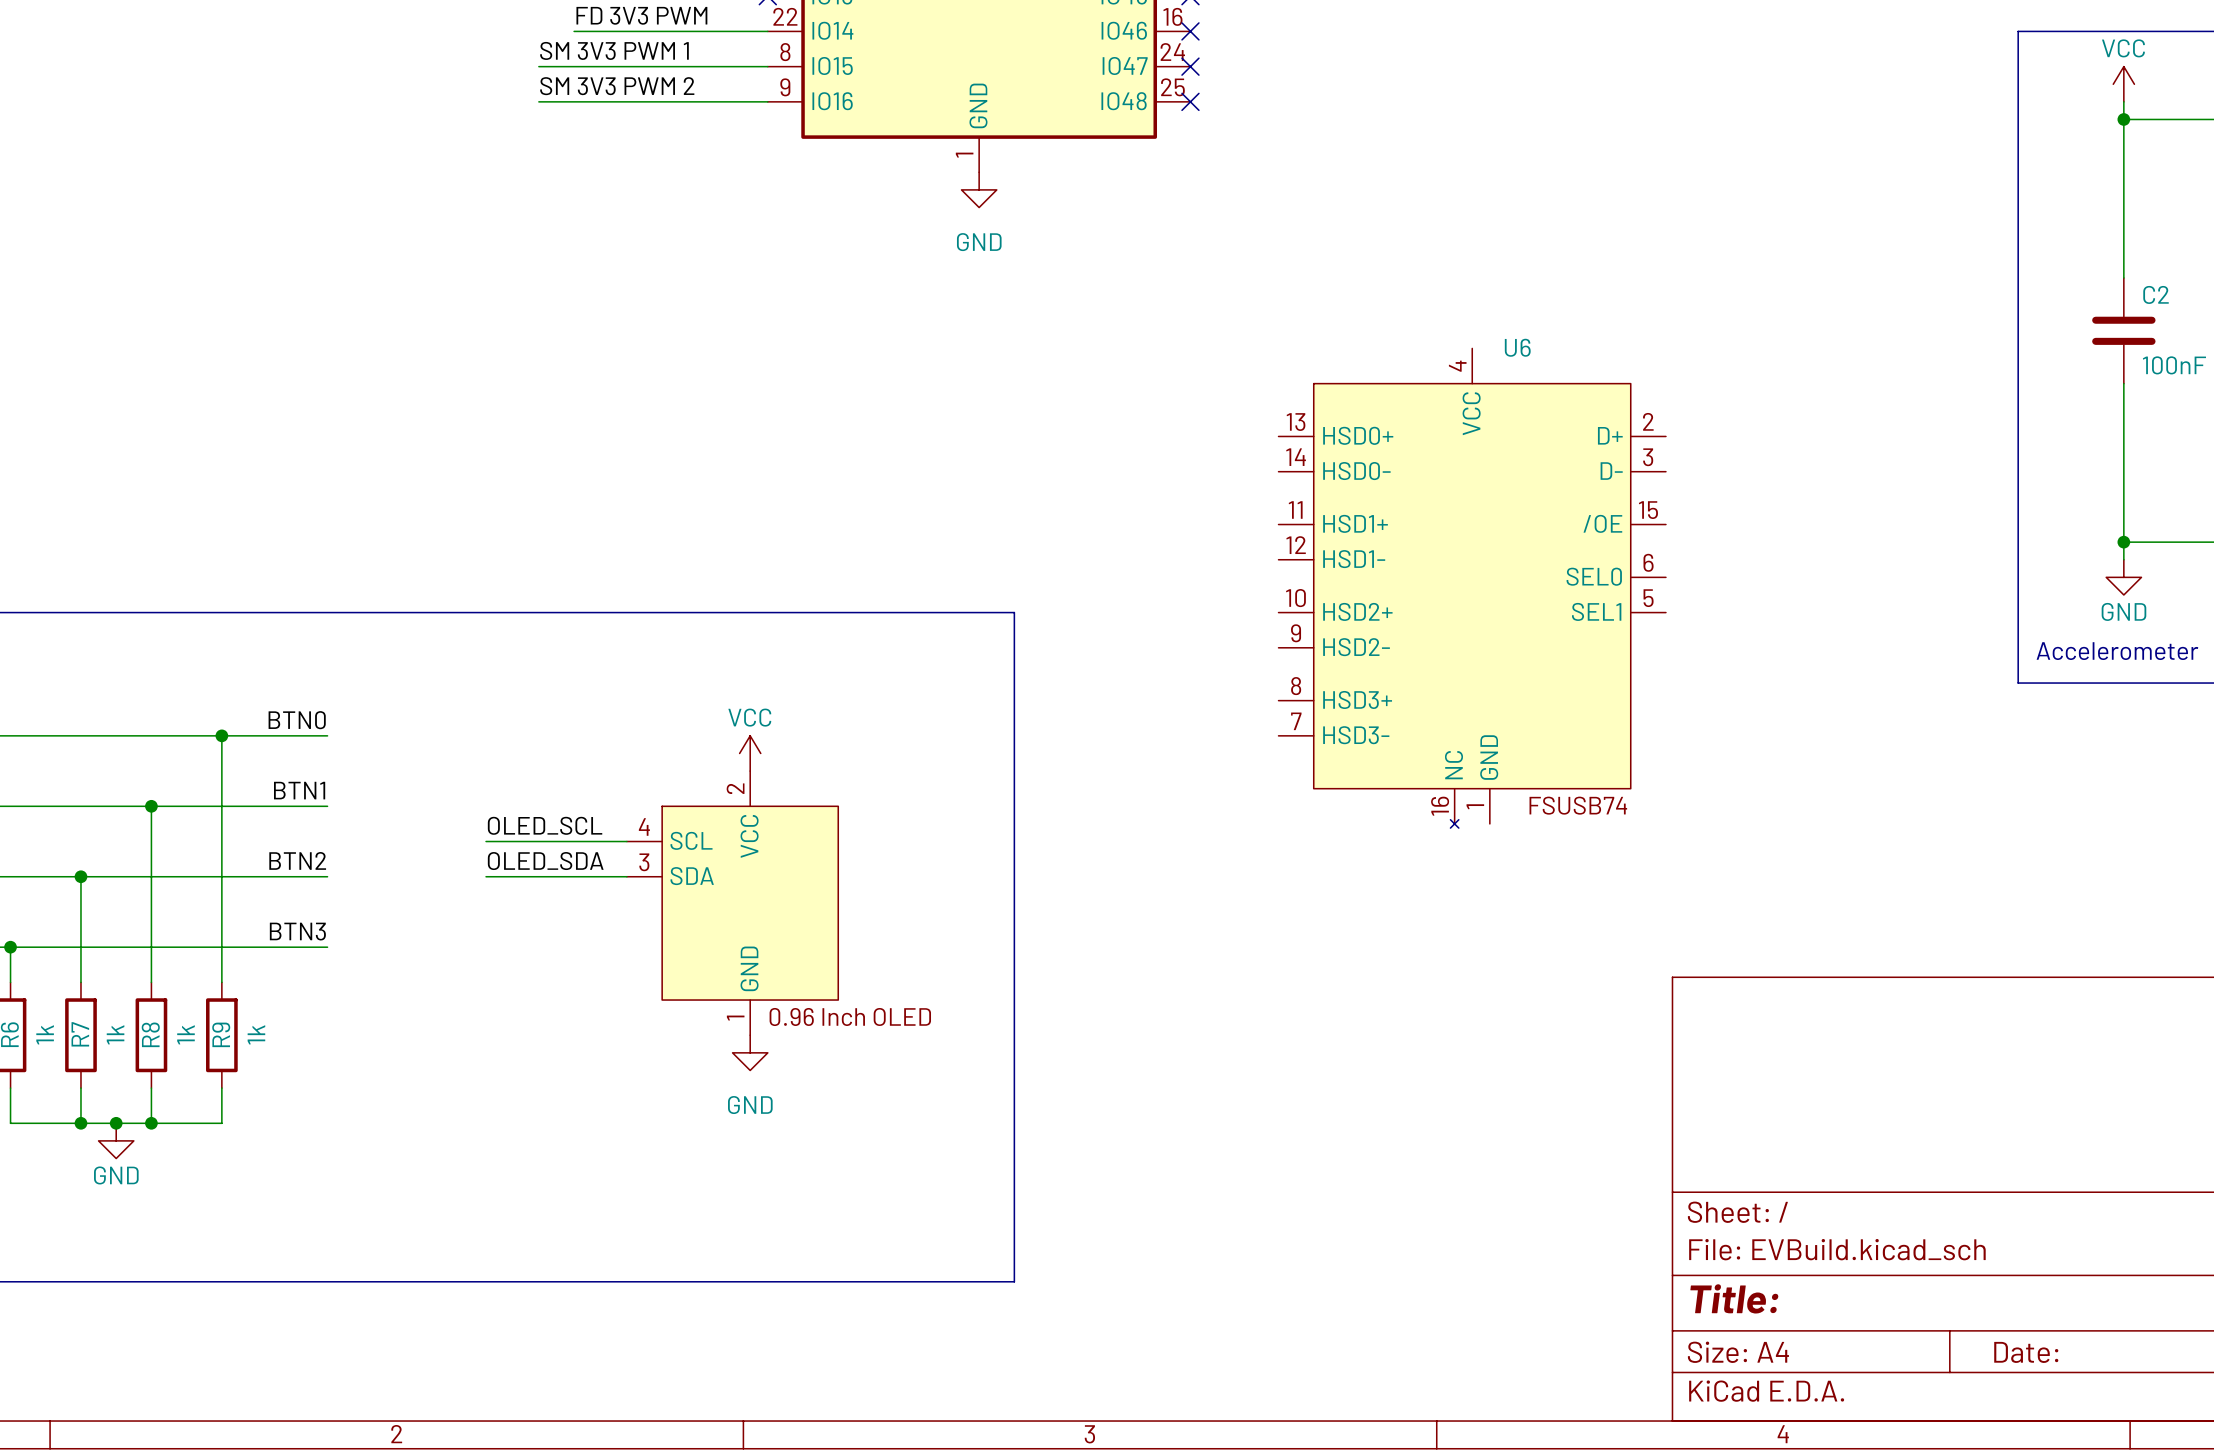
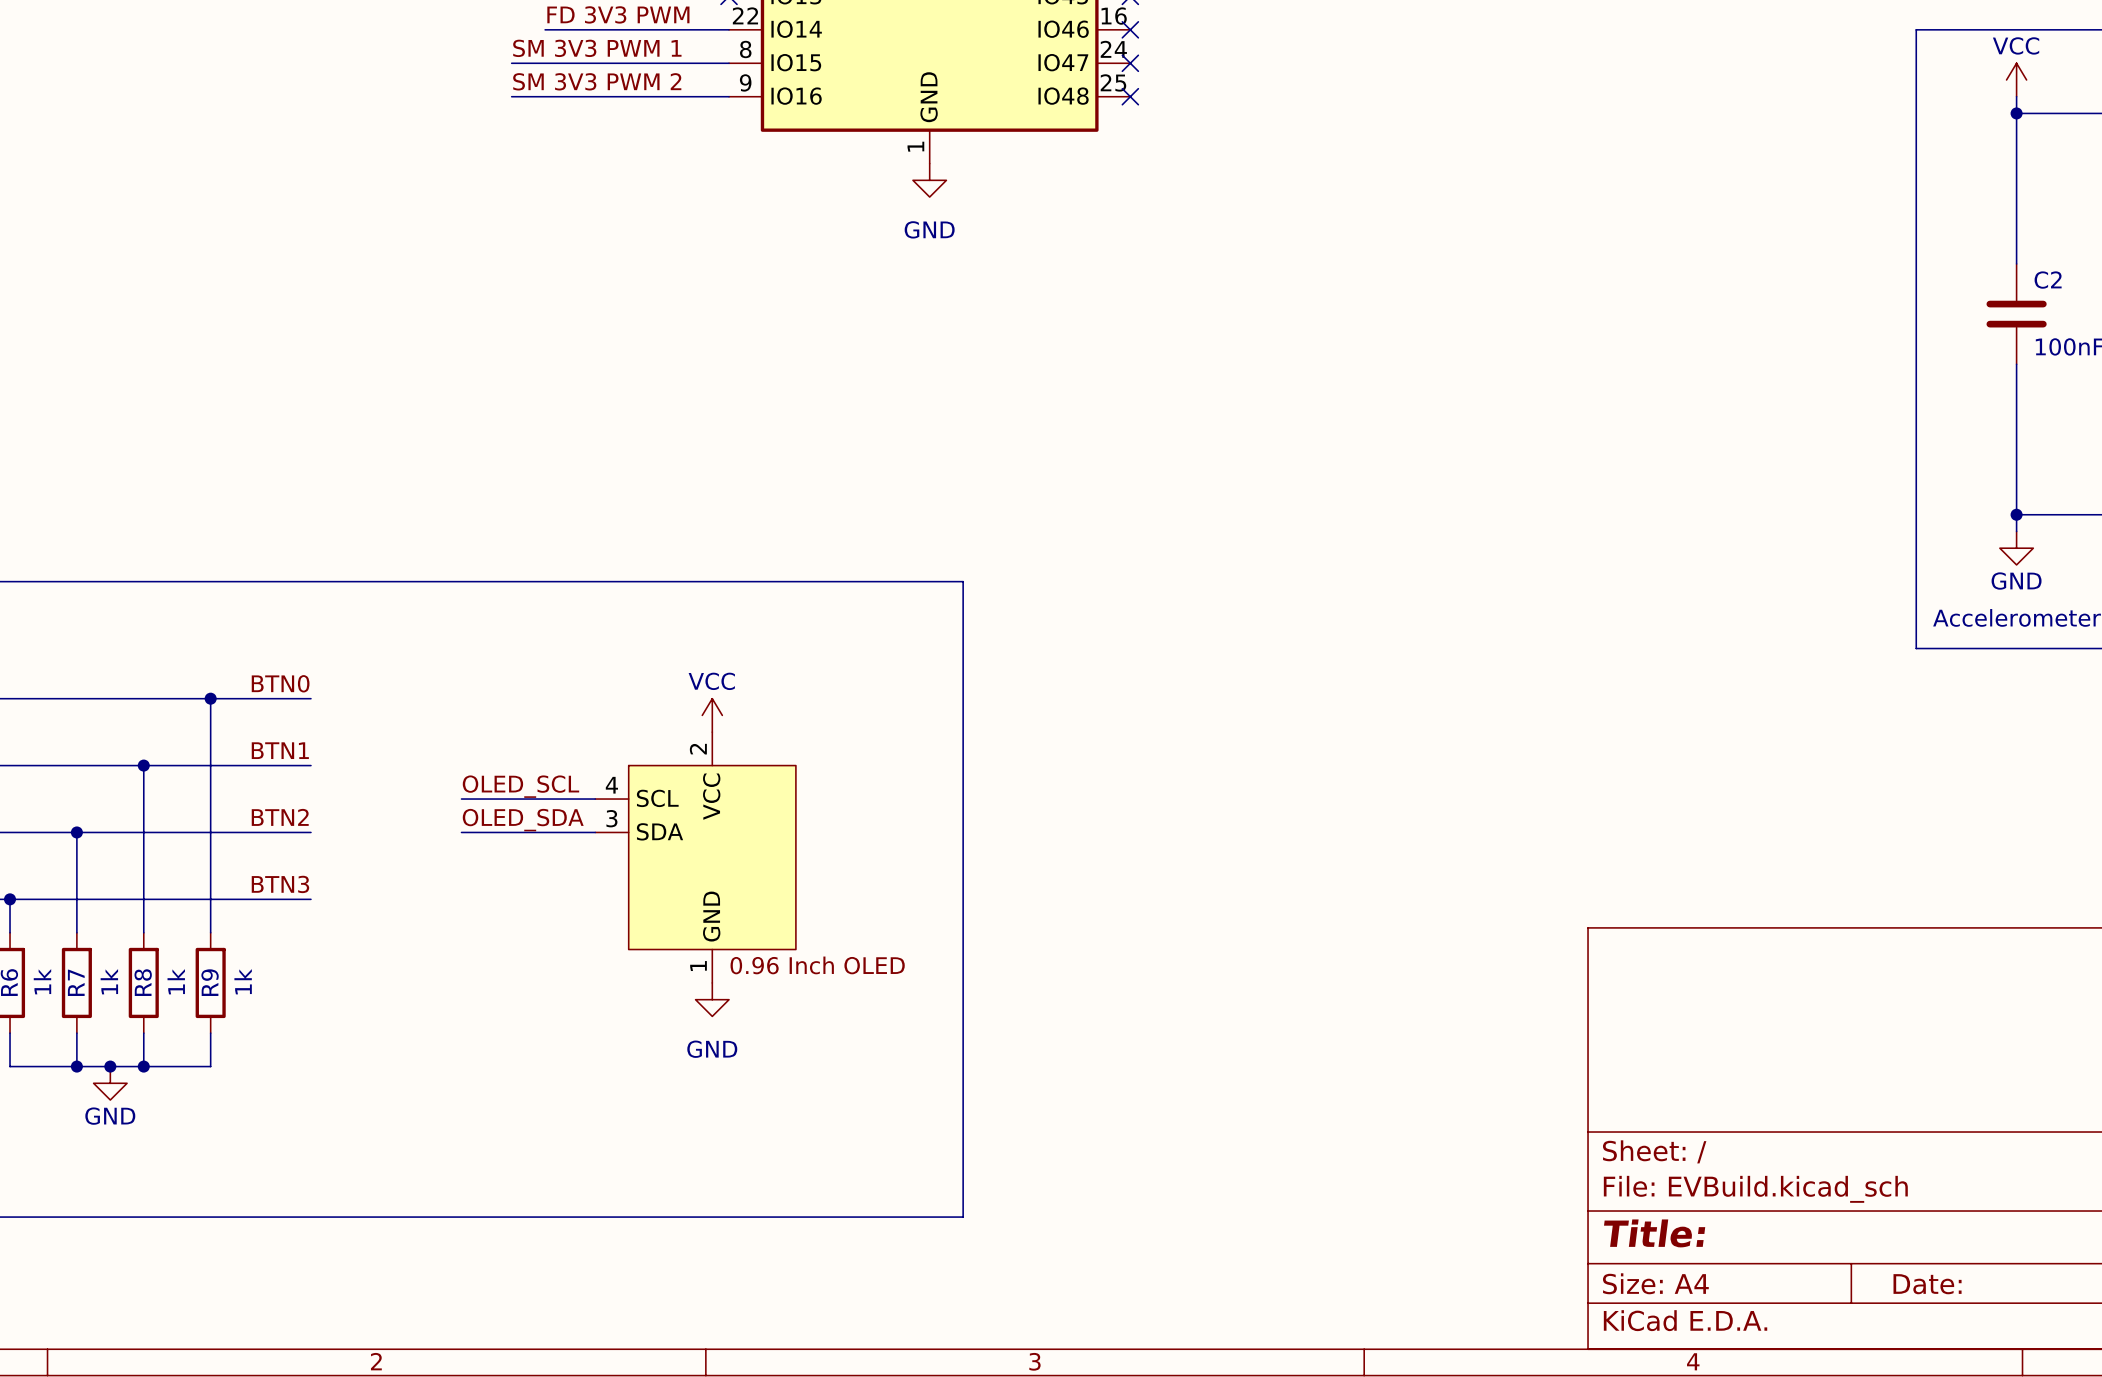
U6: (1472, 588) -> none

